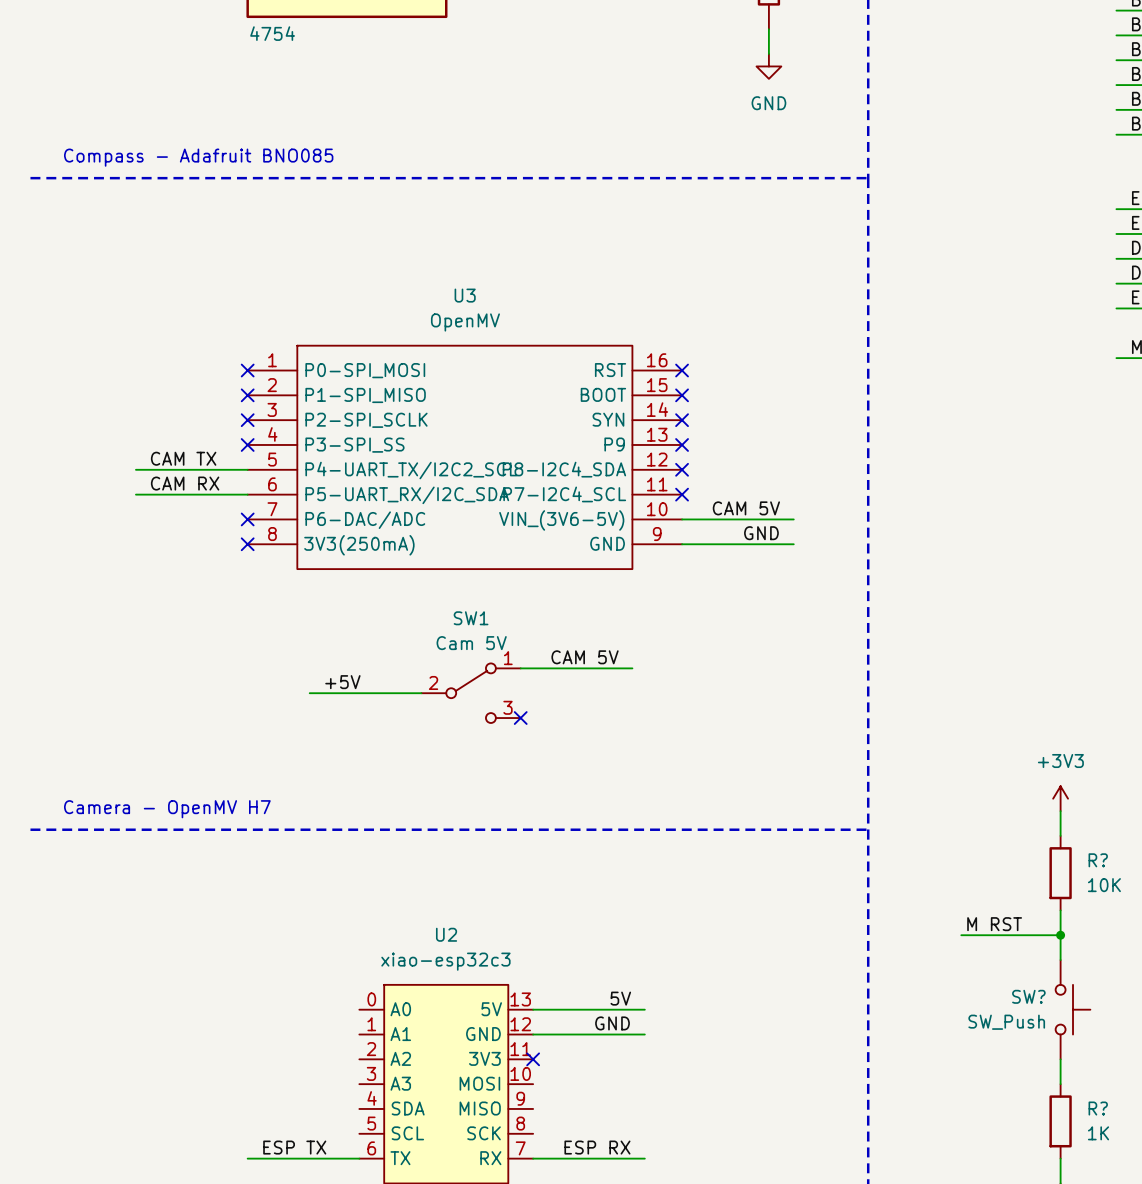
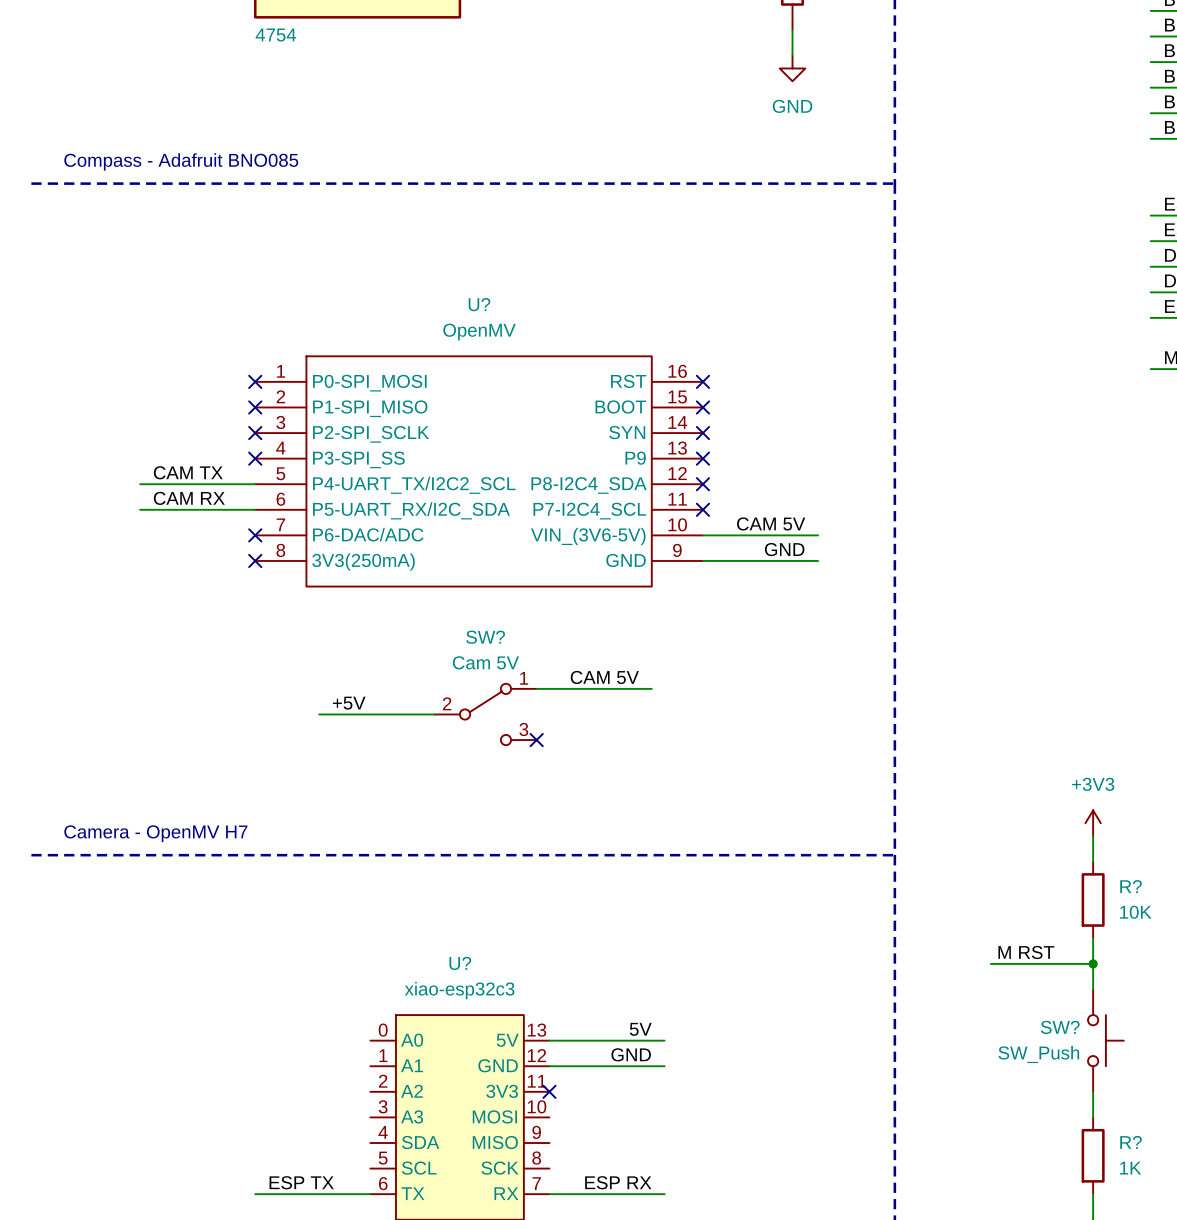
U3 name: U3 (465, 295) -> U? (479, 304)
SW1 name: SW1 (471, 618) -> SW? (485, 637)
U2 name: U2 (446, 934) -> U? (460, 963)

